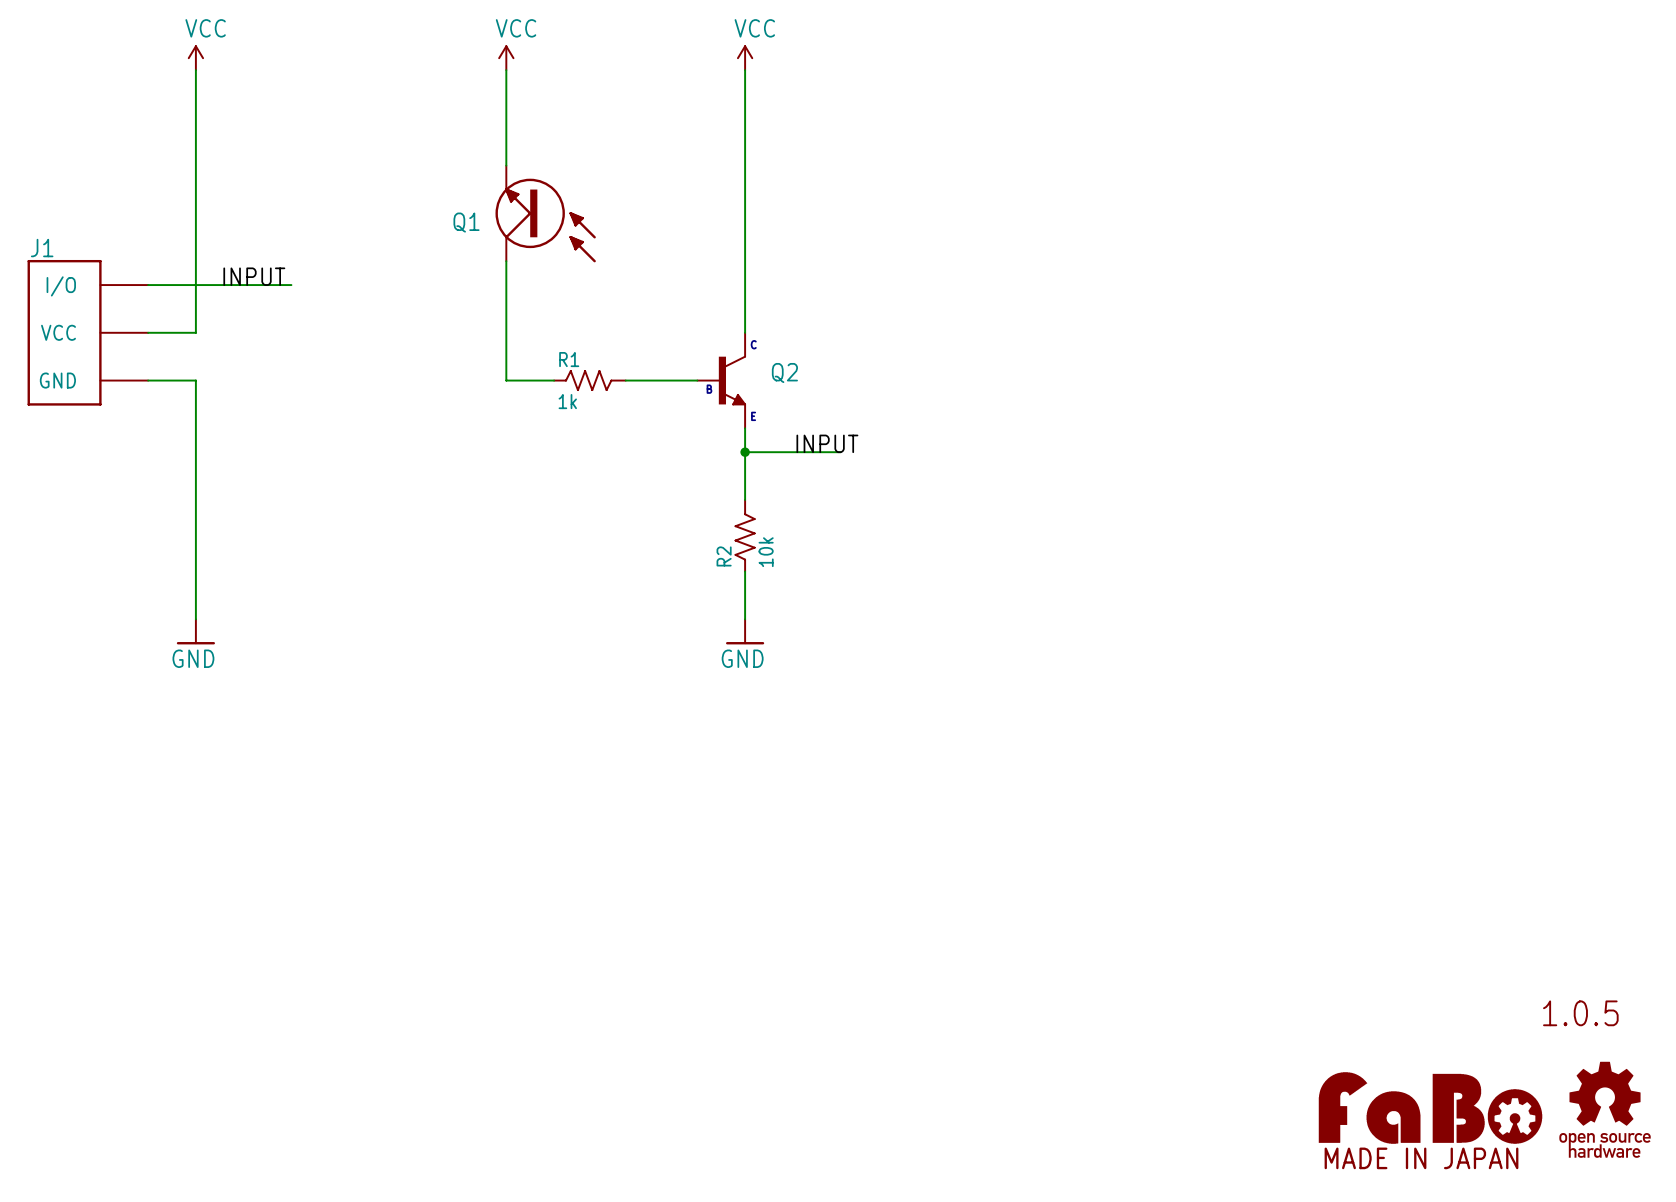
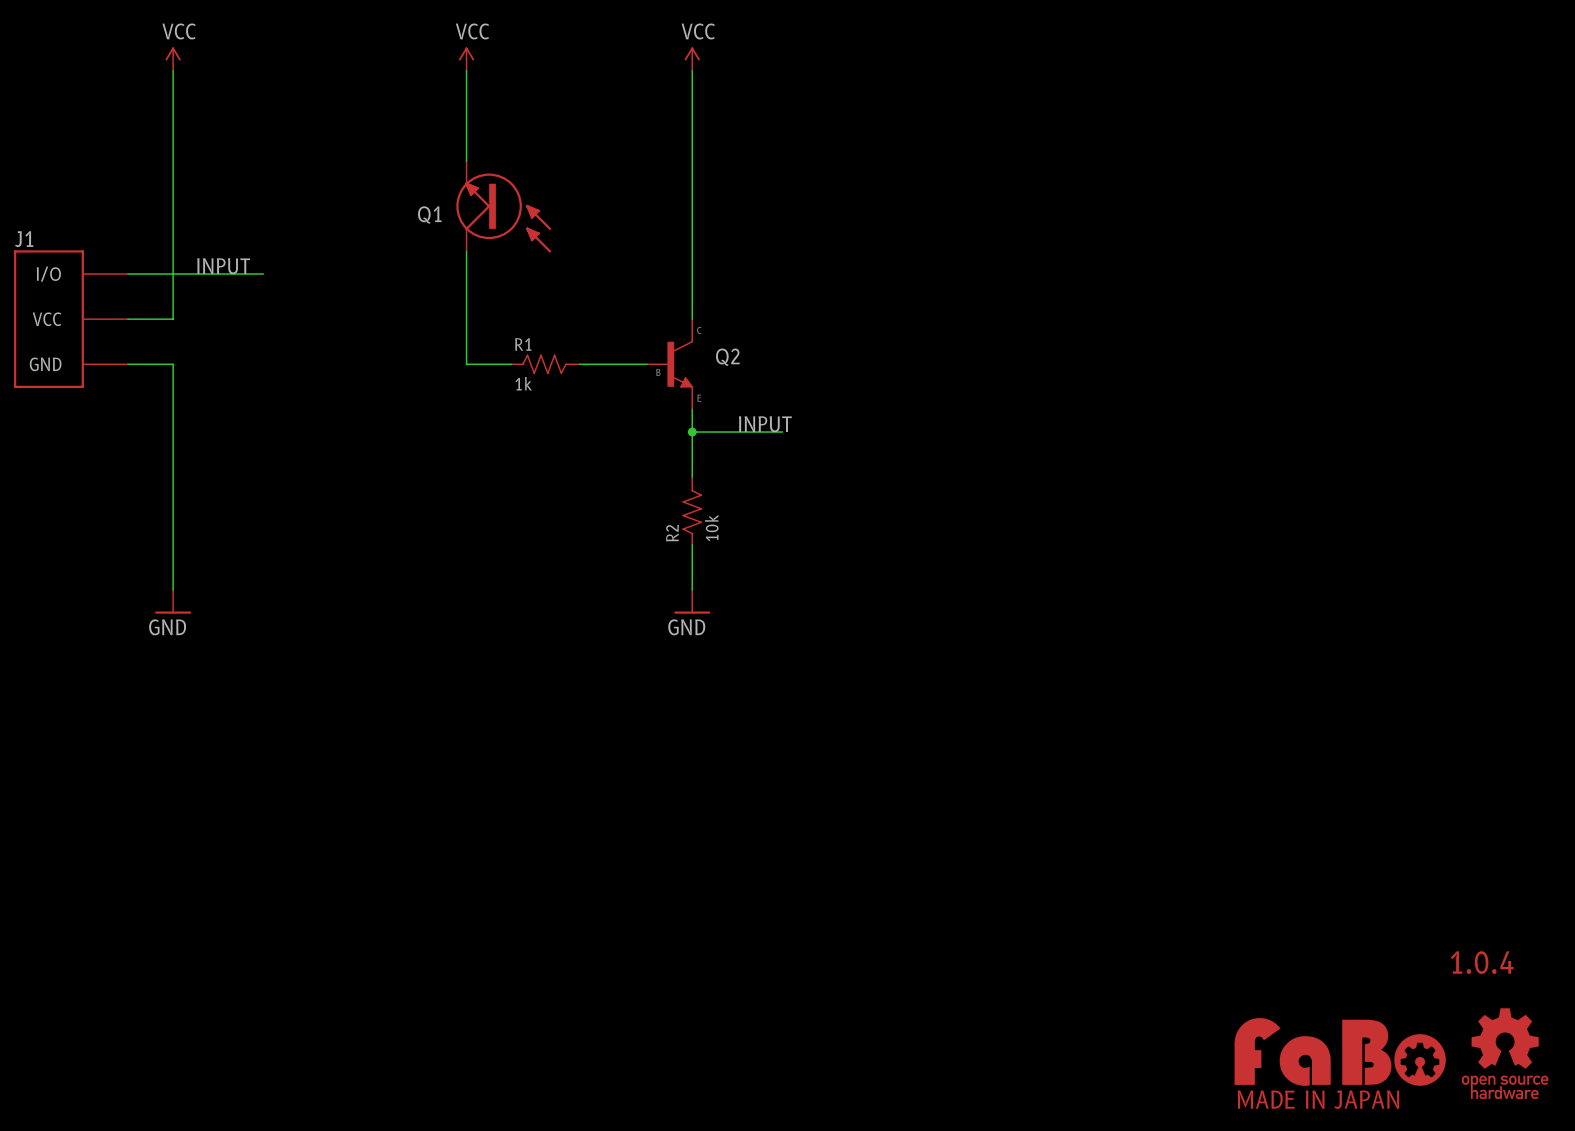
text: 1.0.5 (1580, 1013) -> 1.0.4 (1482, 962)

